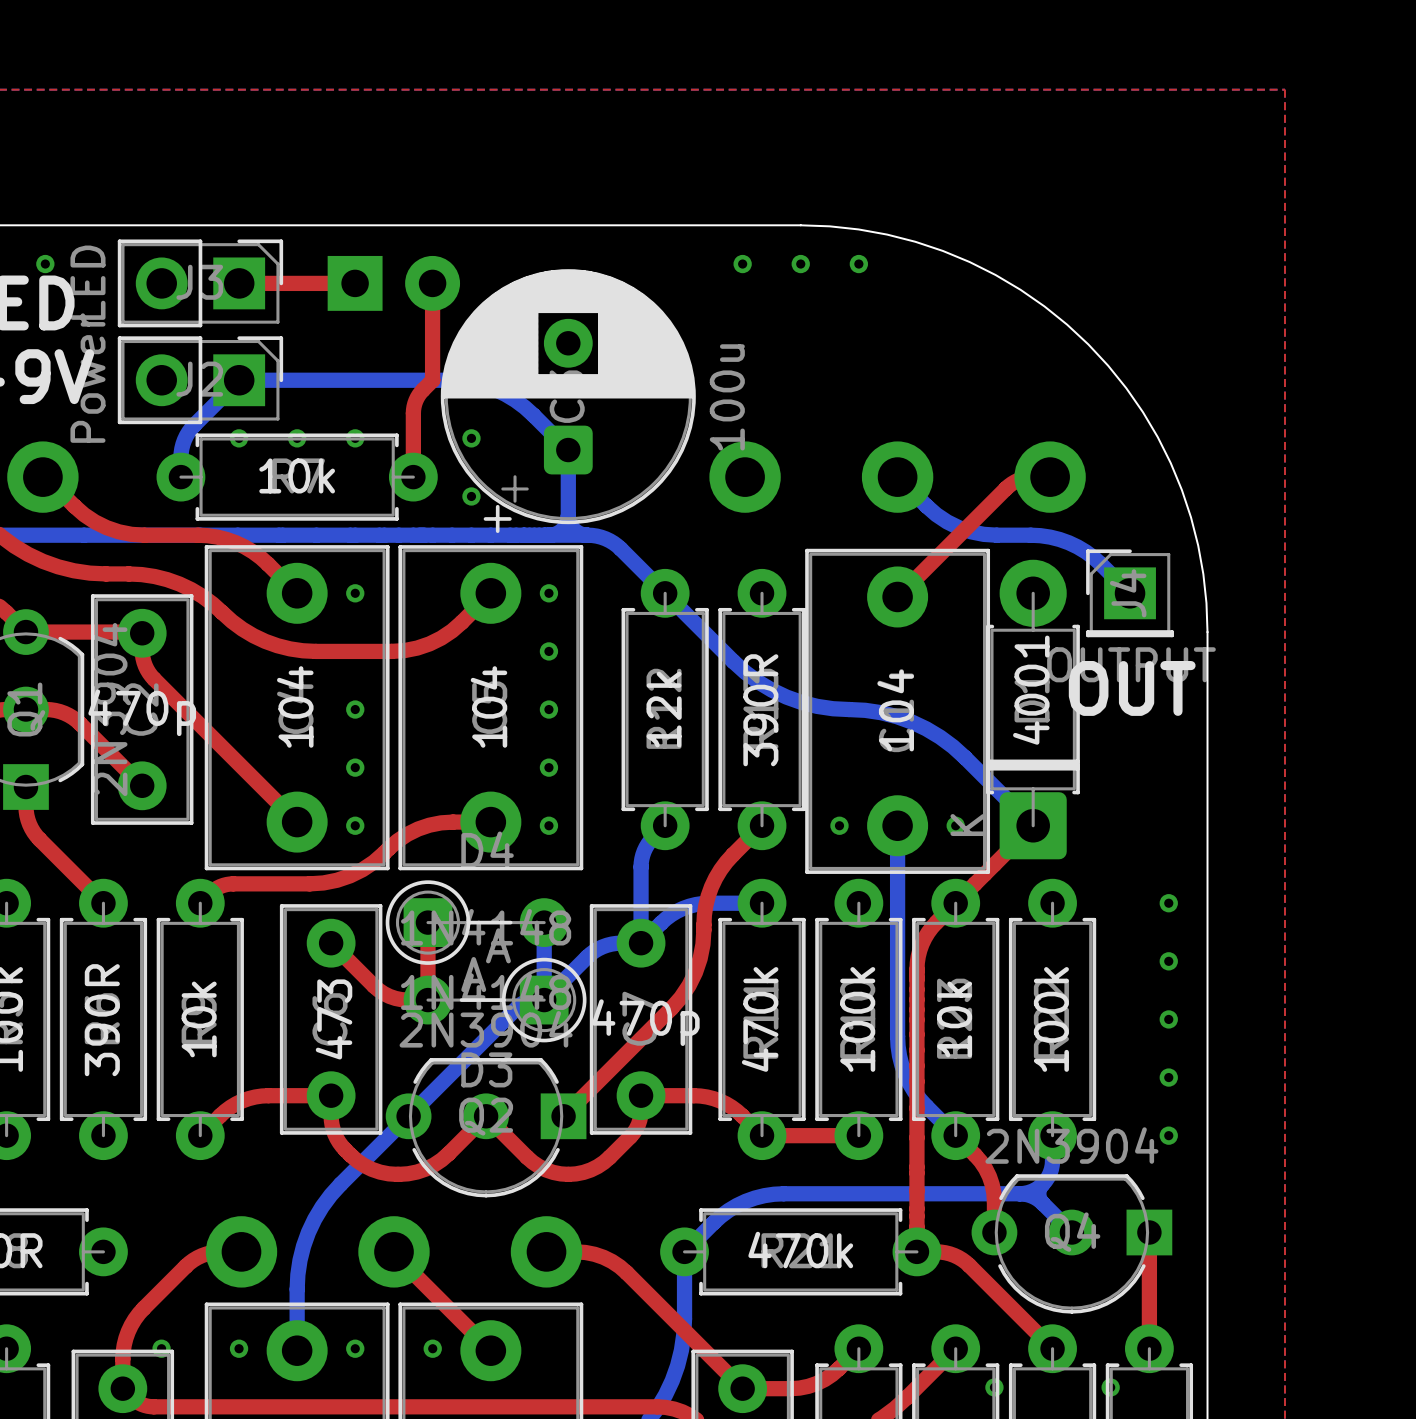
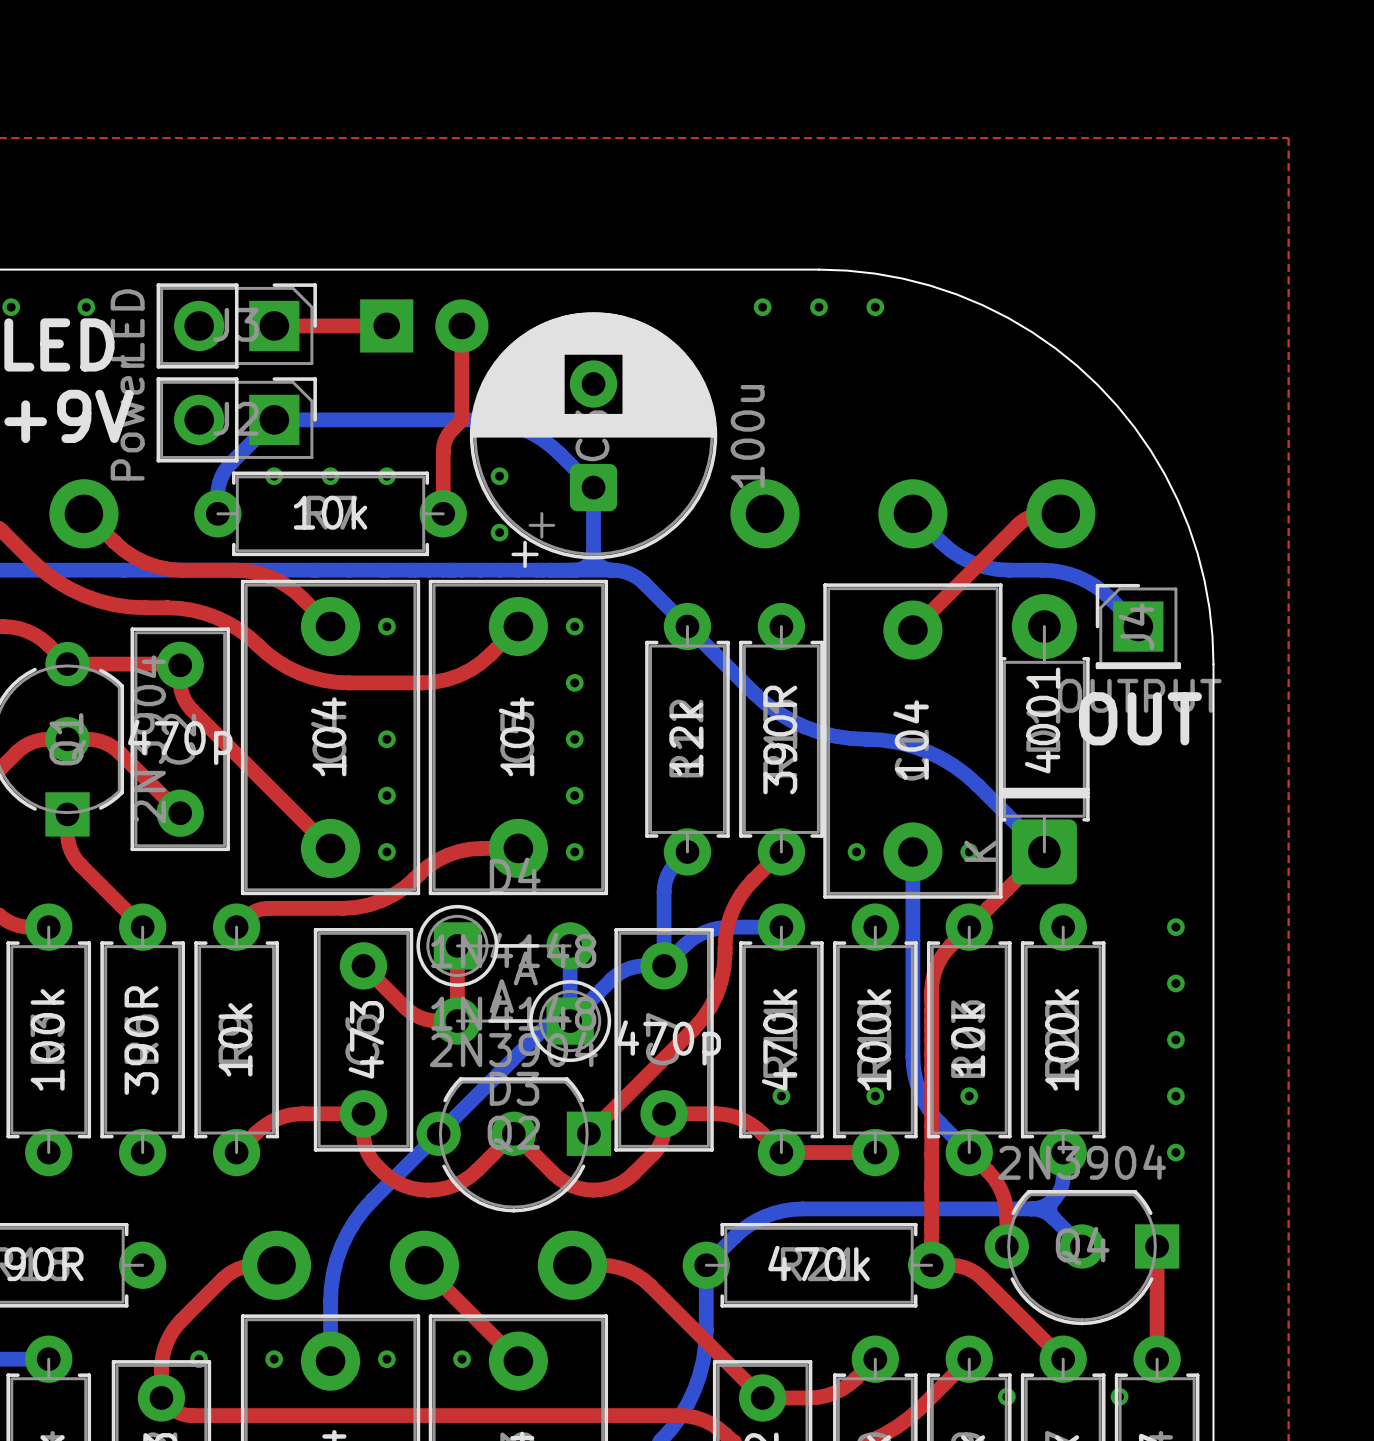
via: none -> (781, 1096)
via: none -> (875, 1096)
via: none -> (969, 1096)

